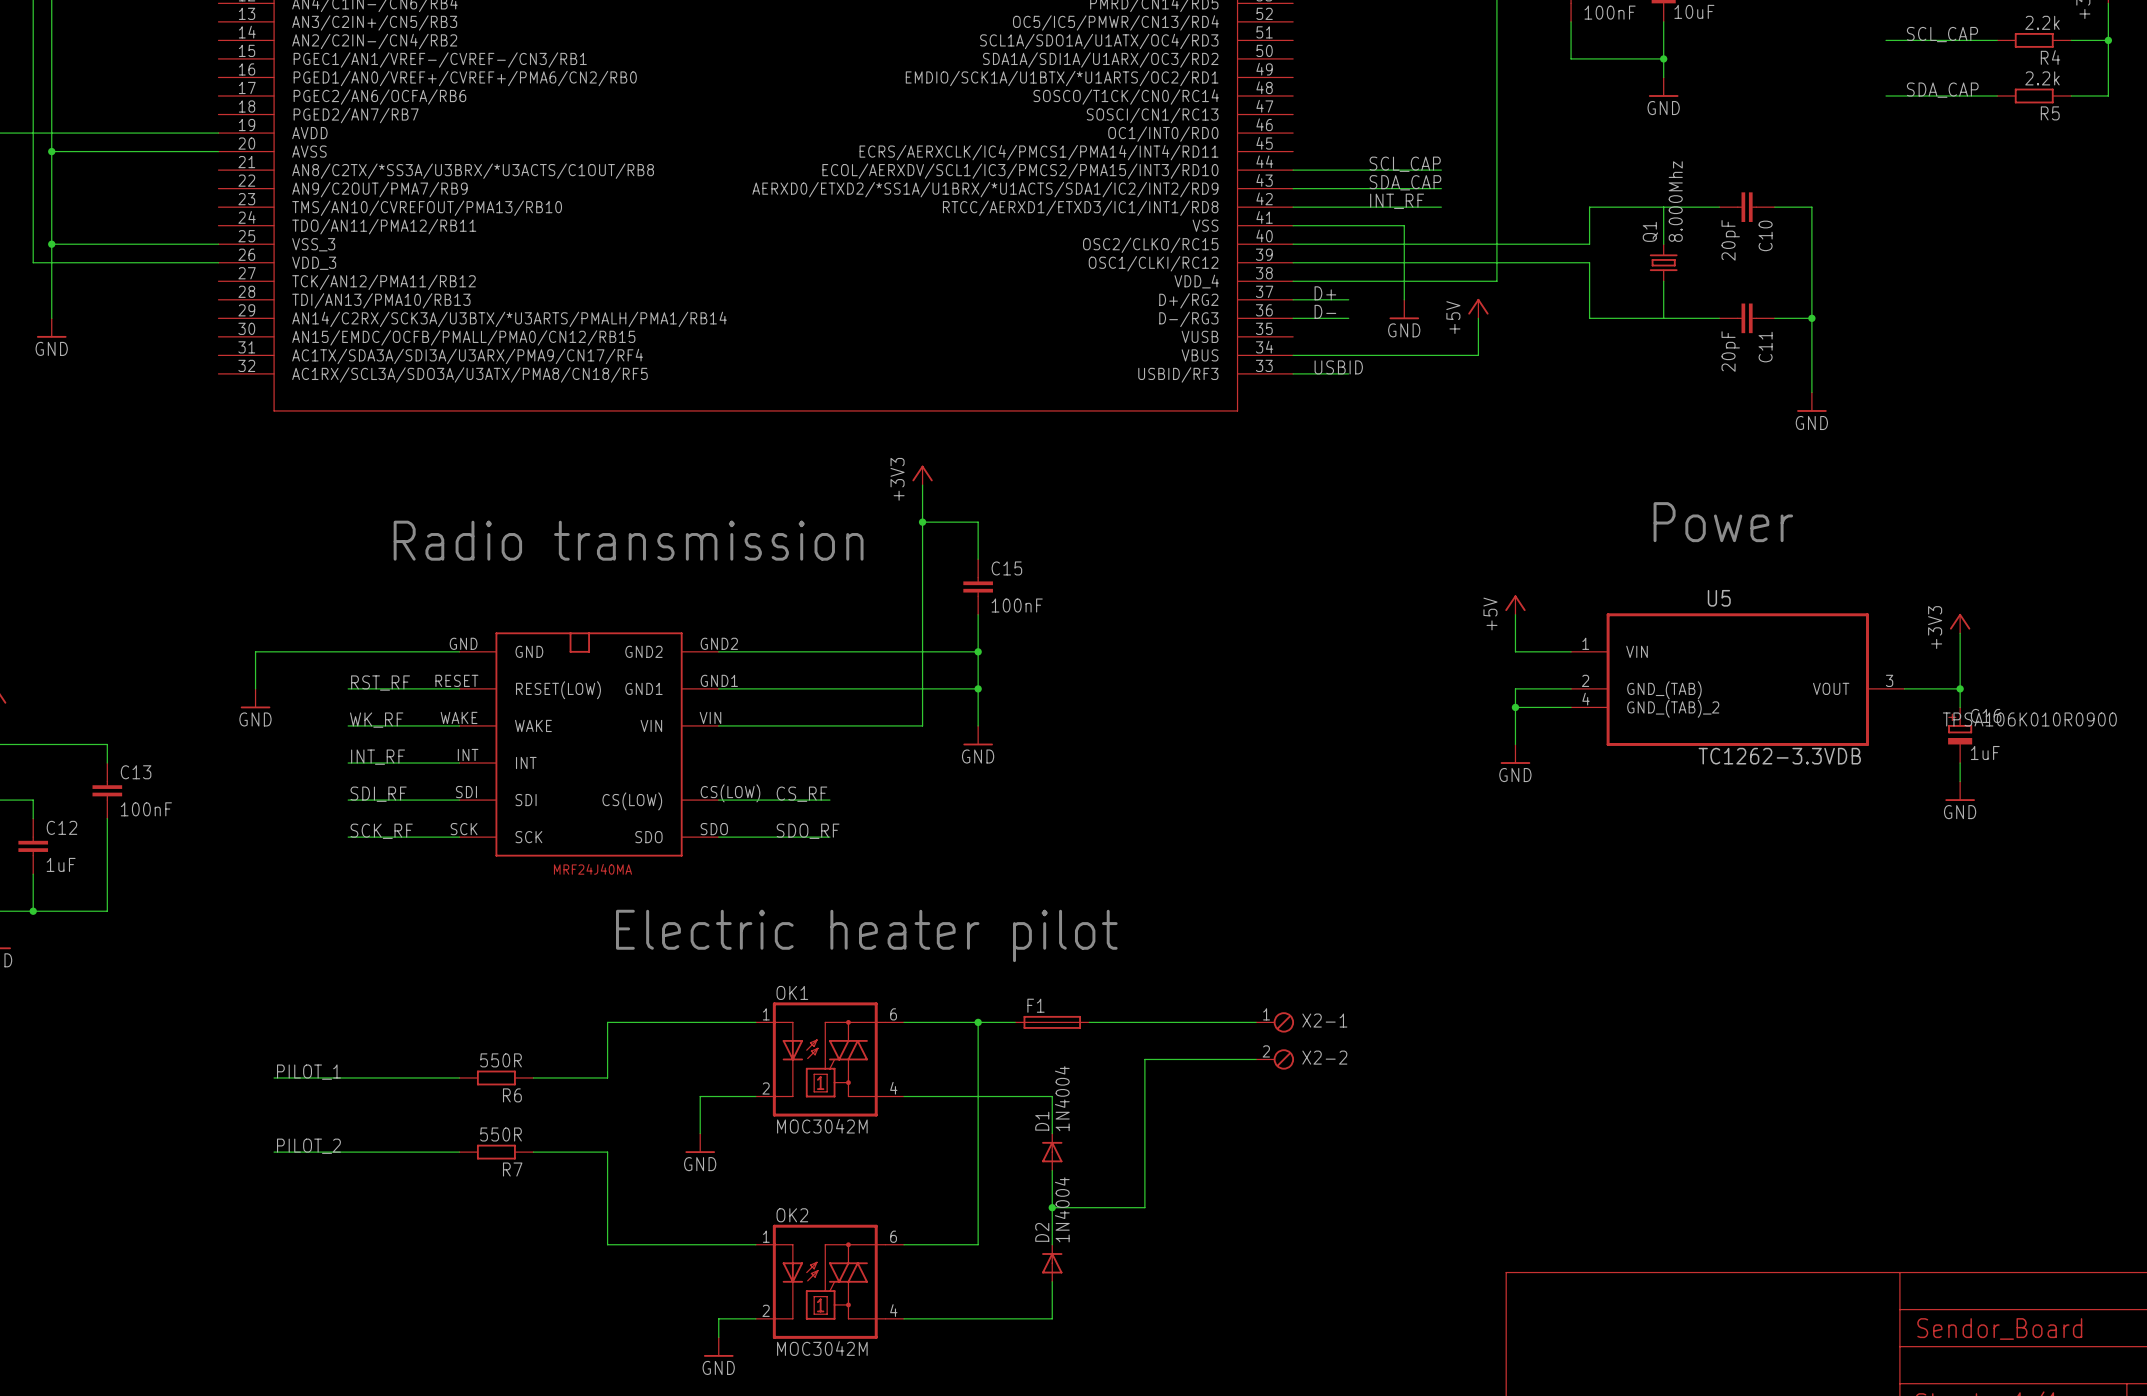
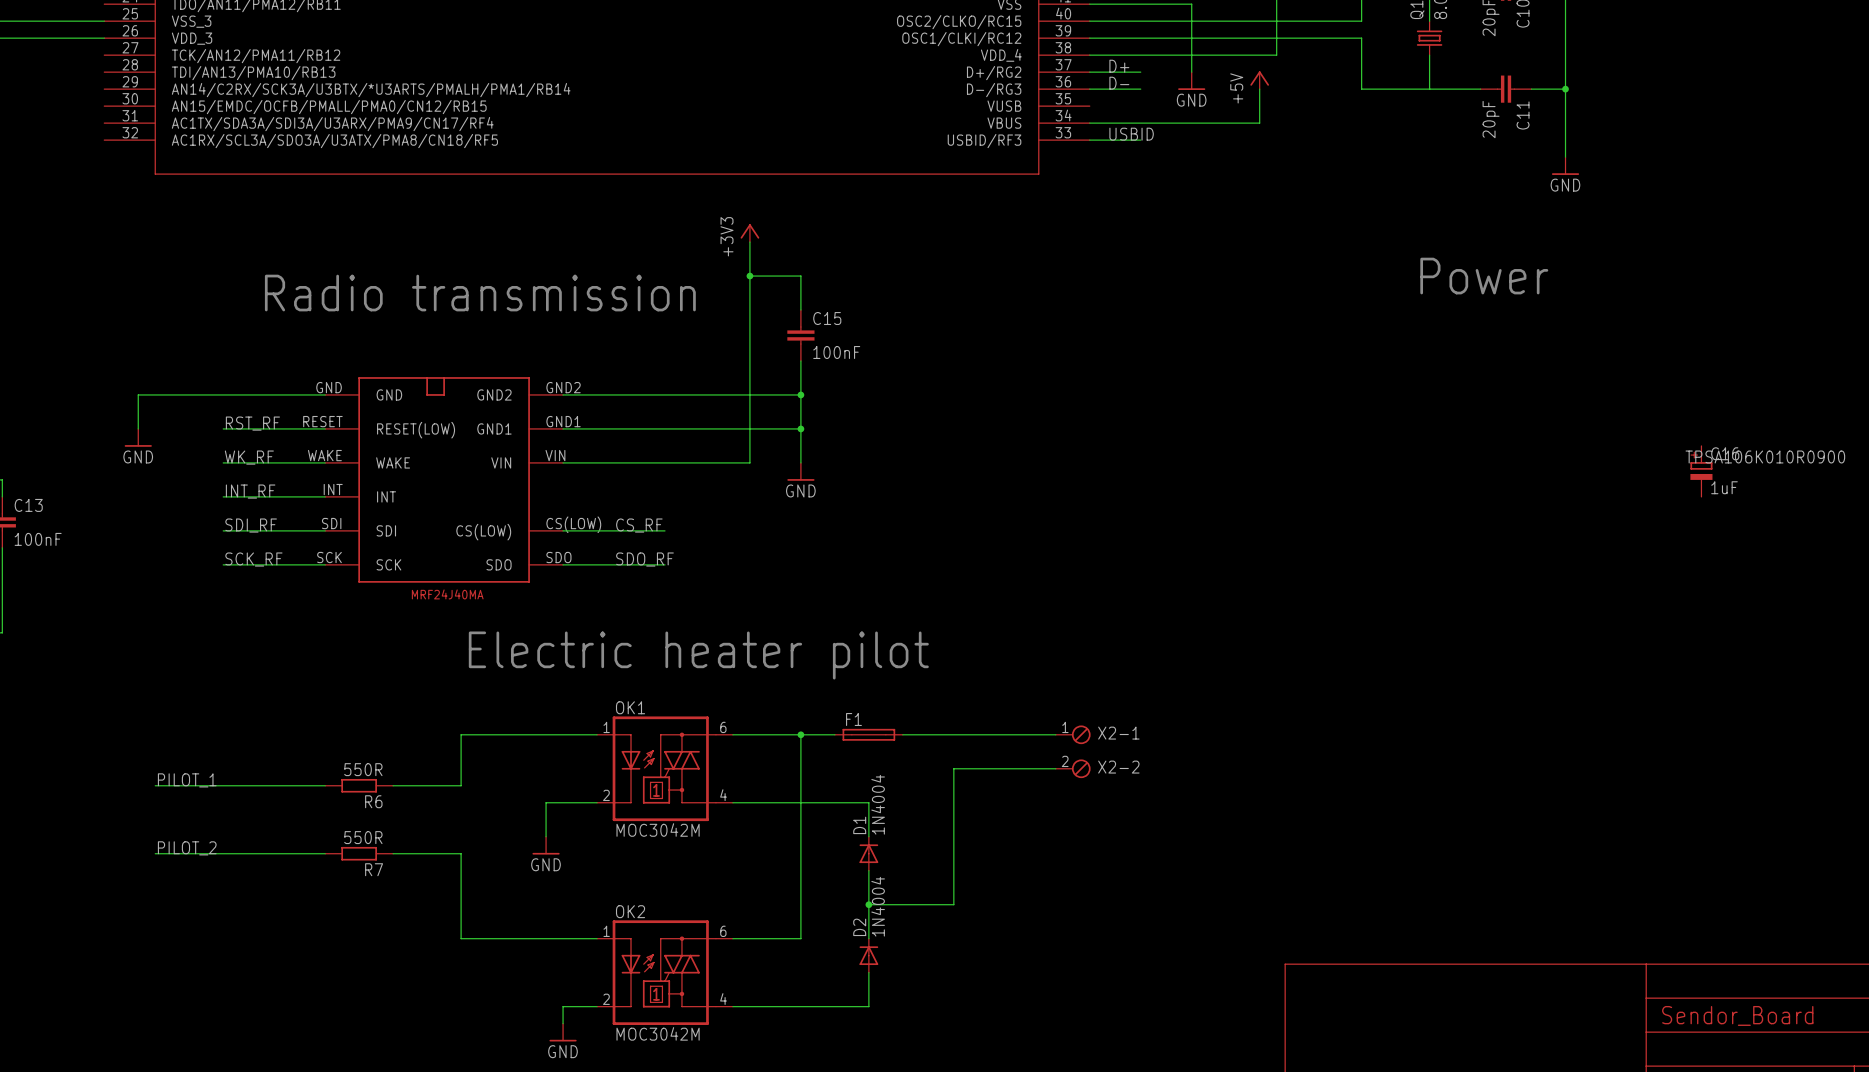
power symbol: +5V (1515, 605) -> none
wire: (1515, 614) (1515, 651) (1571, 651) -> none
power symbol: +3V3 (1960, 623) -> none
wire: (1960, 633) (1960, 707) -> none
U5: TC1262-3.3VDB (1737, 679) -> none
wire: (1571, 688) (1515, 688) (1515, 744) -> none
wire: (1904, 688) (1960, 688) -> none
junction: (1960, 688) -> none
wire: (1515, 707) (1571, 707) -> none
junction: (1515, 707) -> none
power symbol: GND (1515, 754) -> none
wire: (1960, 763) (1960, 781) -> none
power symbol: GND (1960, 791) -> none

